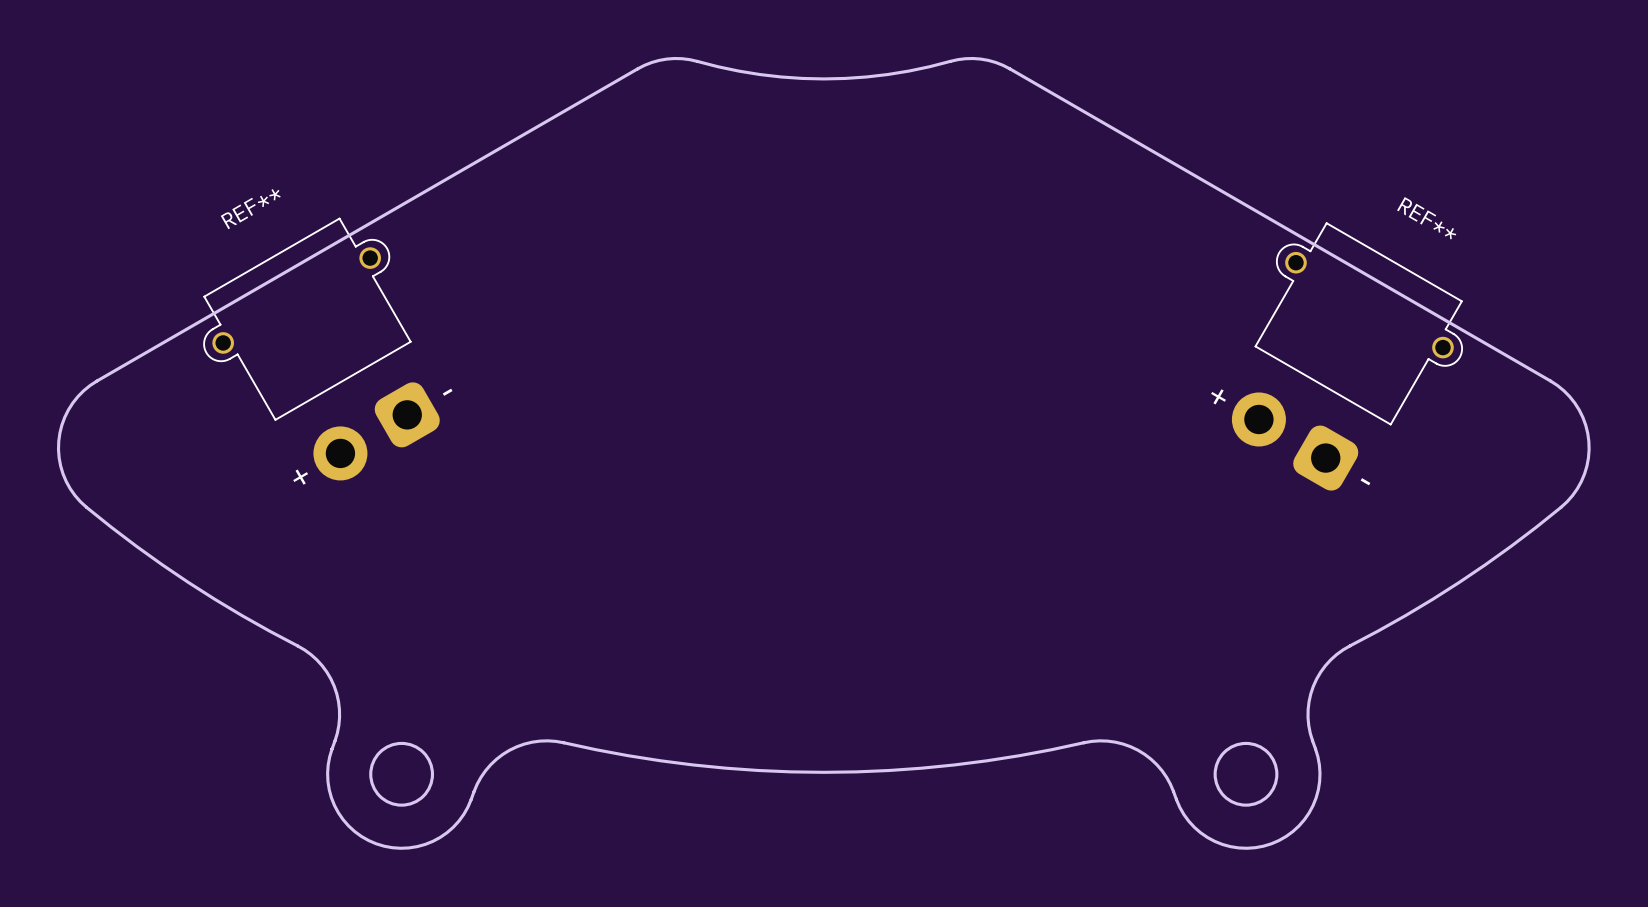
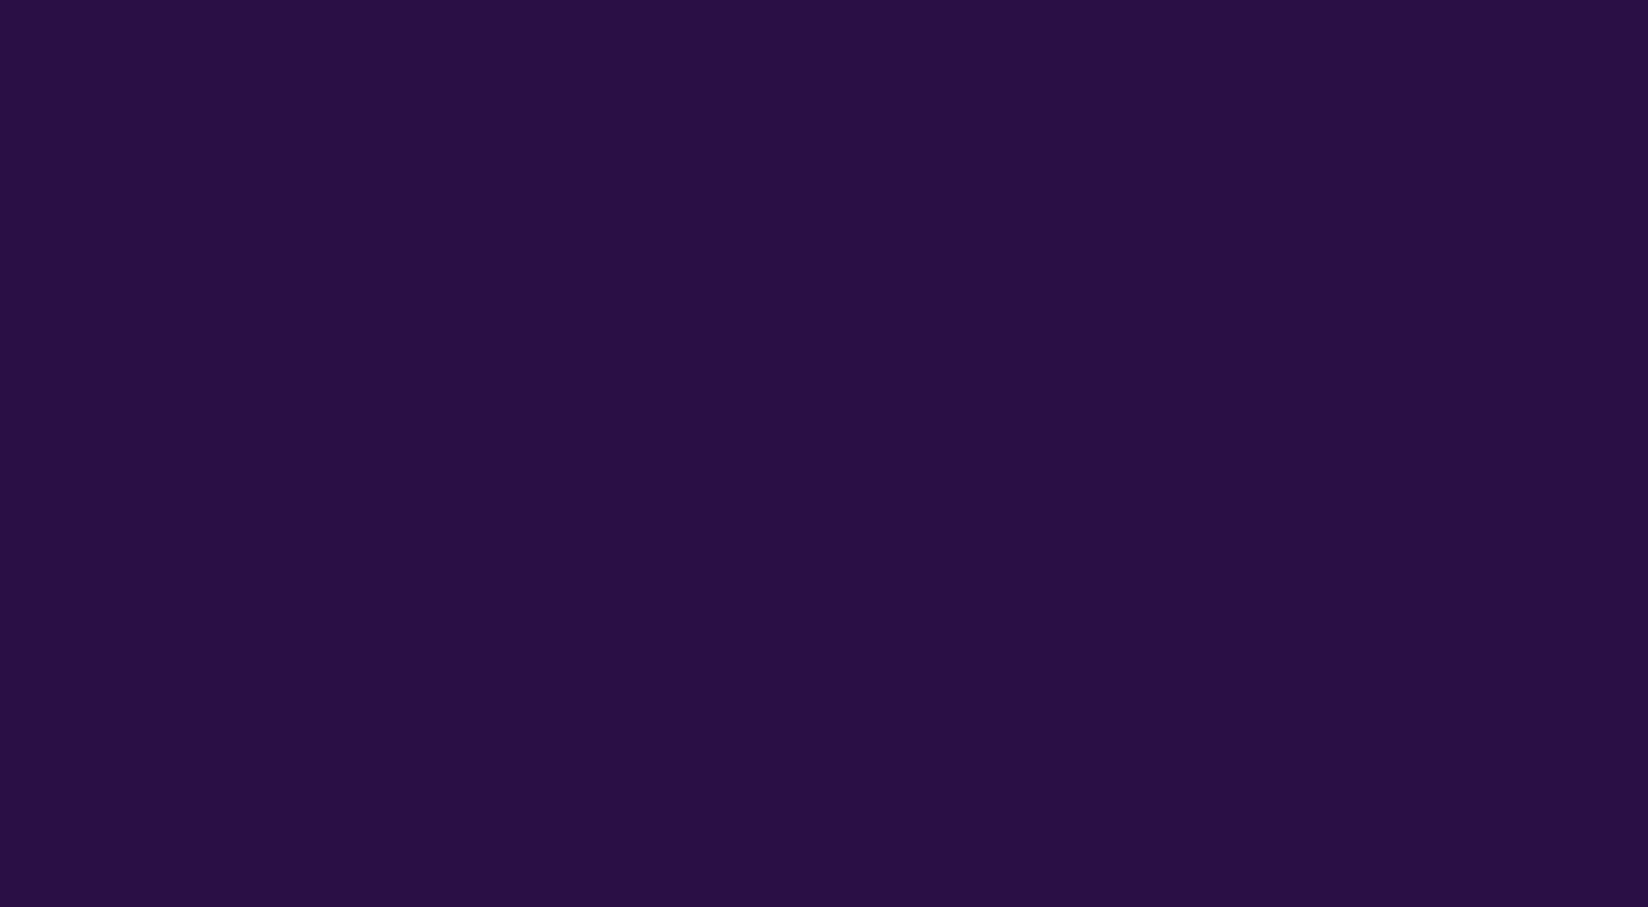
board edge: (697, 61) (759, 74) (823, 78) (887, 74) (965, 58) (988, 60) (1002, 65) (1557, 385) (1574, 403) (1582, 417) (1587, 433) (1588, 457) (1581, 481) (1567, 501) (1511, 546) (1432, 599) (1343, 649) (1325, 665) (1313, 686) (1308, 709) (1310, 733) (1319, 765) (1319, 781) (1316, 797) (1304, 819) (1292, 831) (1279, 840) (1263, 846) (1238, 847) (1222, 844) (1207, 837) (1194, 827) (1183, 814) (1166, 777) (1151, 759) (1130, 746) (1115, 742) (1099, 740) (1019, 755) (954, 764) (889, 770) (823, 772) (758, 770) (693, 764) (628, 755) (556, 741) (540, 741) (516, 746) (502, 754) (490, 764) (477, 784) (463, 814) (453, 827) (440, 837) (425, 844) (408, 847) (384, 846) (368, 840) (354, 831) (343, 819) (334, 805) (329, 789) (328, 765) (337, 733) (339, 709) (336, 693) (326, 672) (316, 659) (304, 649) (242, 615) (188, 582) (136, 546) (80, 501) (66, 481) (59, 457) (58, 441) (64, 417) (77, 396) (97, 380) (637, 68) (651, 62) (666, 59) (682, 58) (697, 61) -> none
REF**: (321, 349) -> none
REF**: (1347, 356) -> none
round board edge: [369, 741, 435, 807] -> none
round board edge: [1213, 741, 1279, 807] -> none

